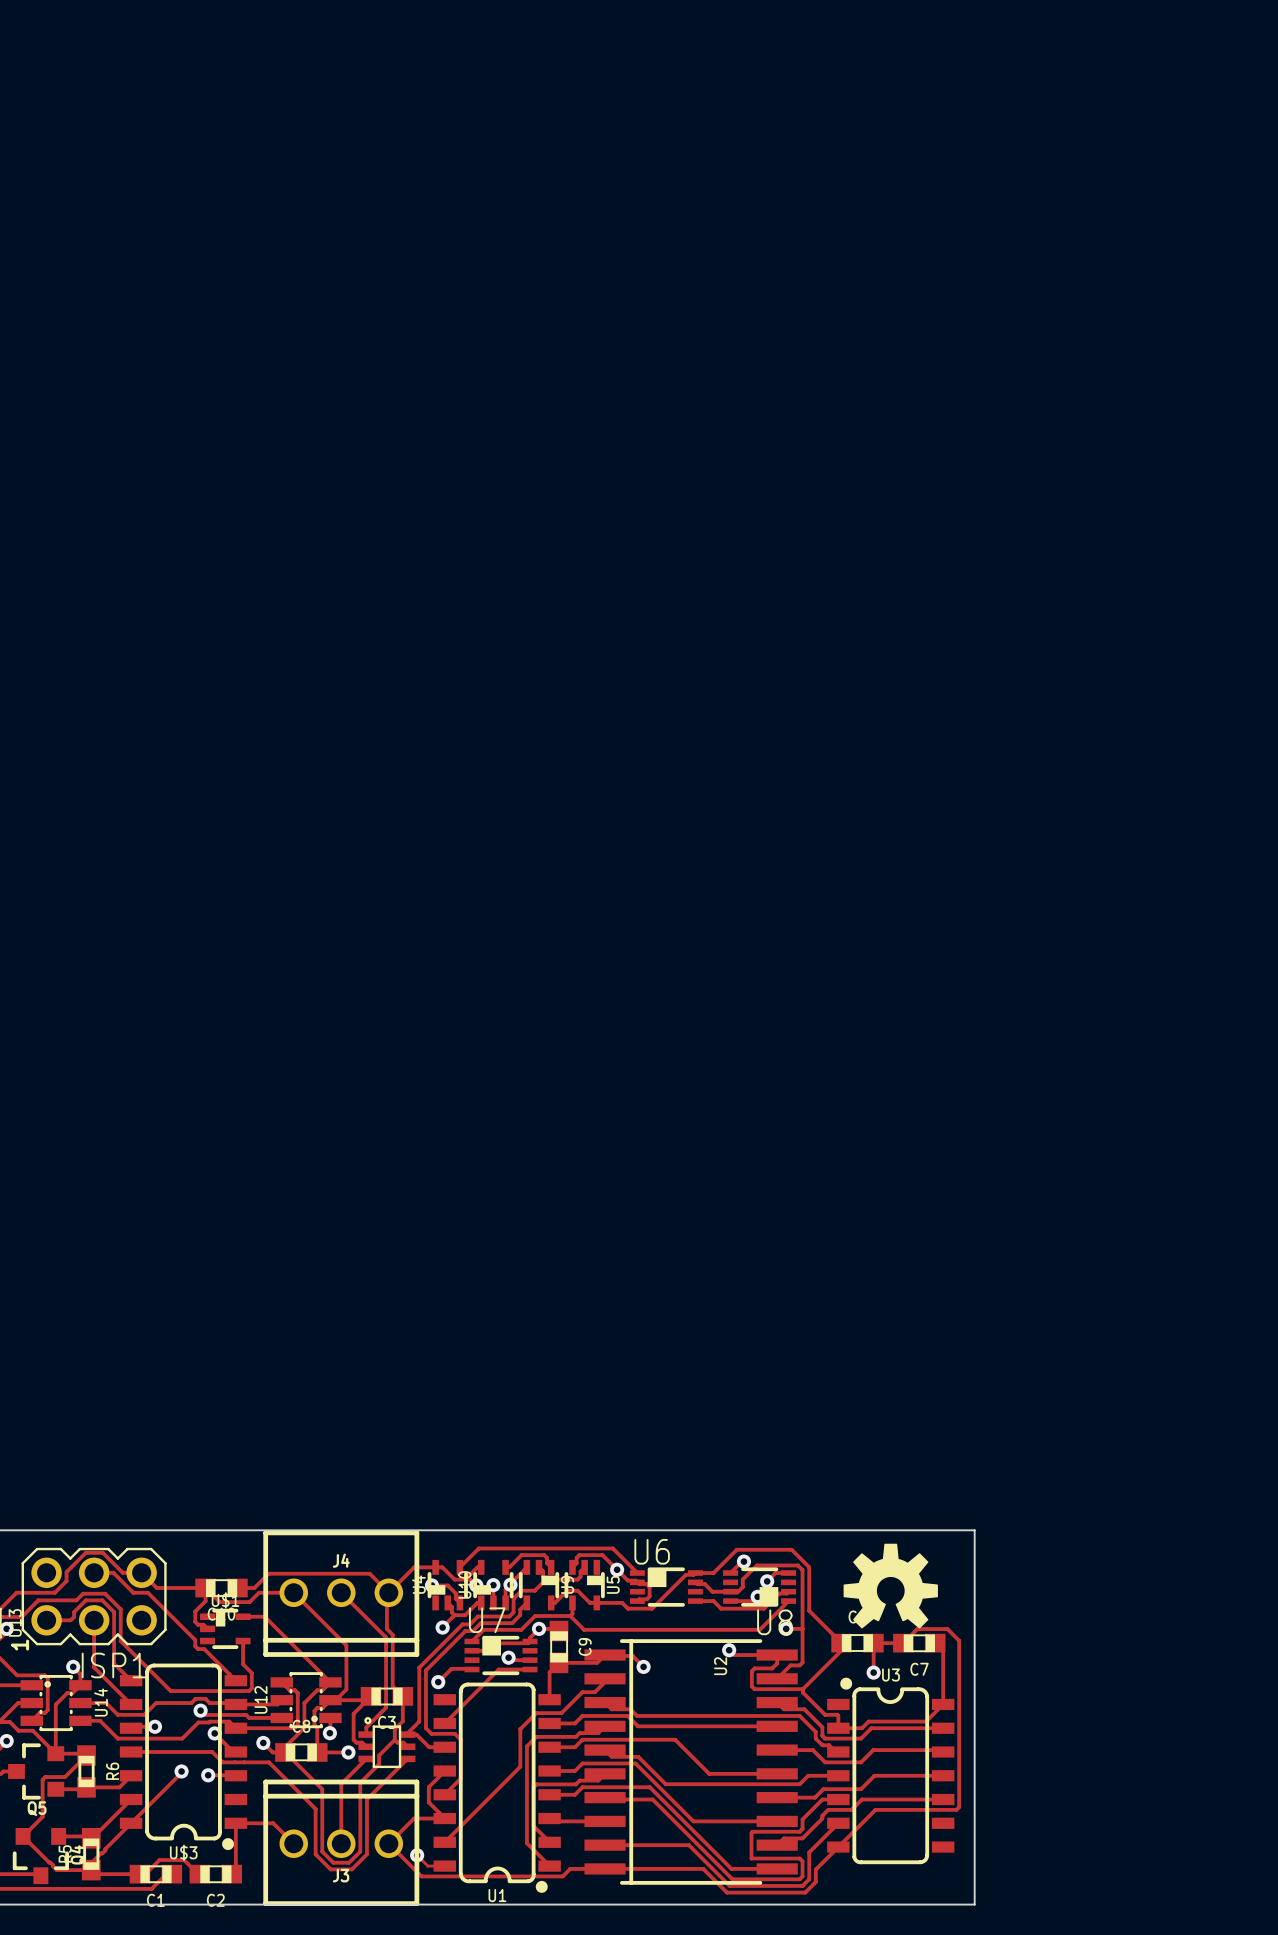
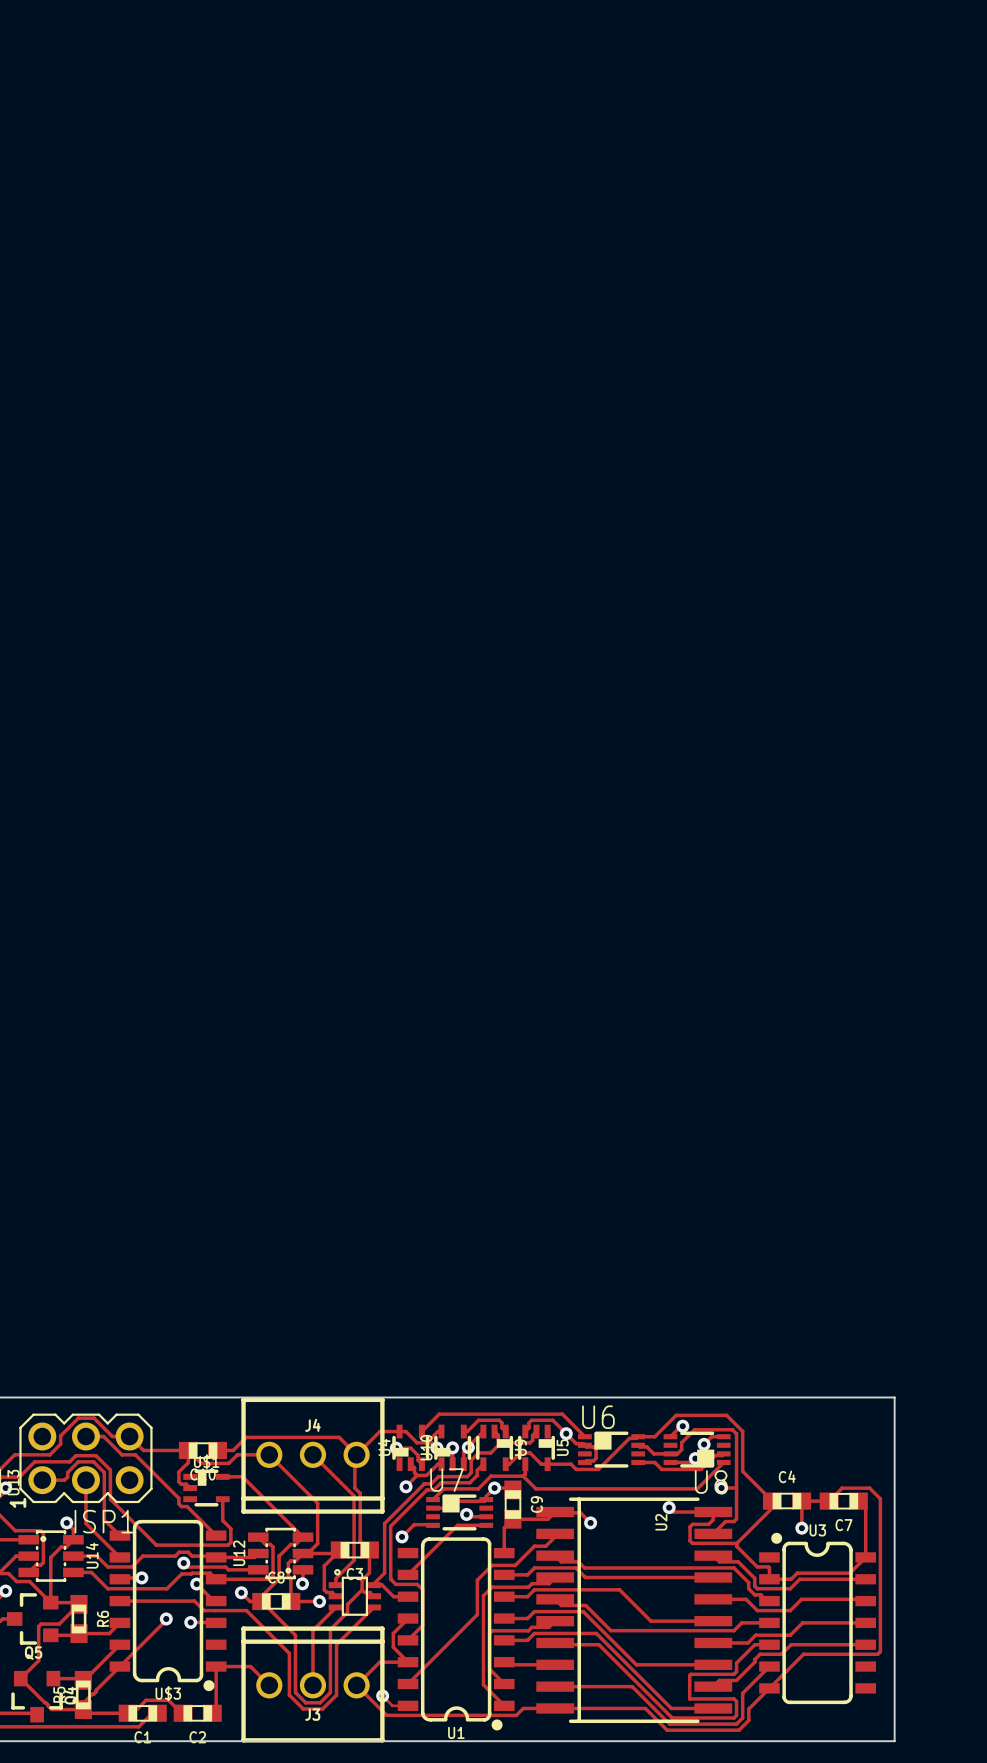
drawing: [843, 1543, 938, 1629] -> none

